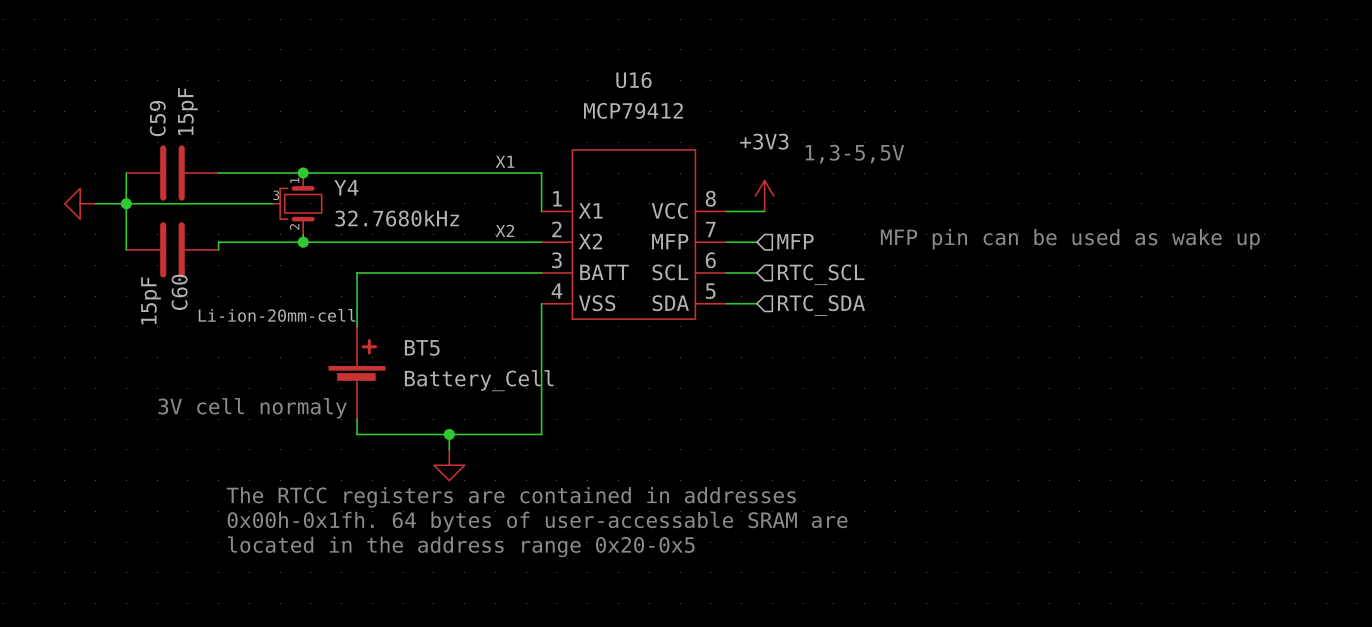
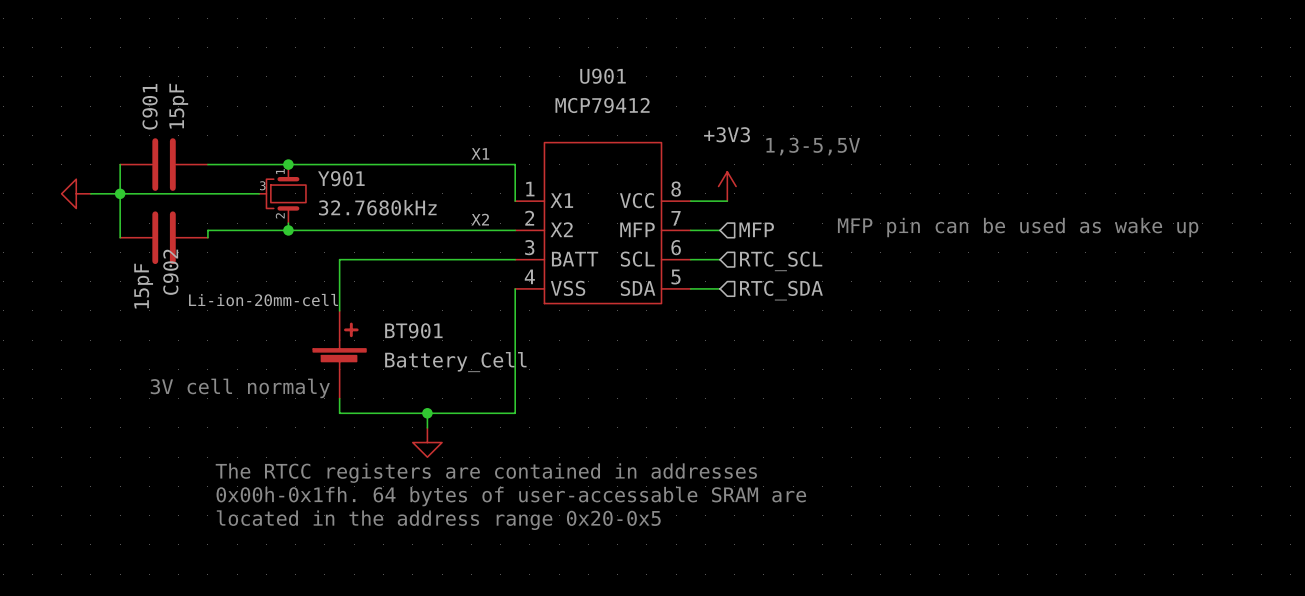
U16 name: U16 (633, 80) -> U901 (603, 76)
C59 name: C59 (157, 118) -> C901 (150, 106)
Y4 name: Y4 (346, 187) -> Y901 (341, 178)
C60 name: C60 (179, 292) -> C902 (170, 272)
BT5 name: BT5 (422, 347) -> BT901 (413, 330)

